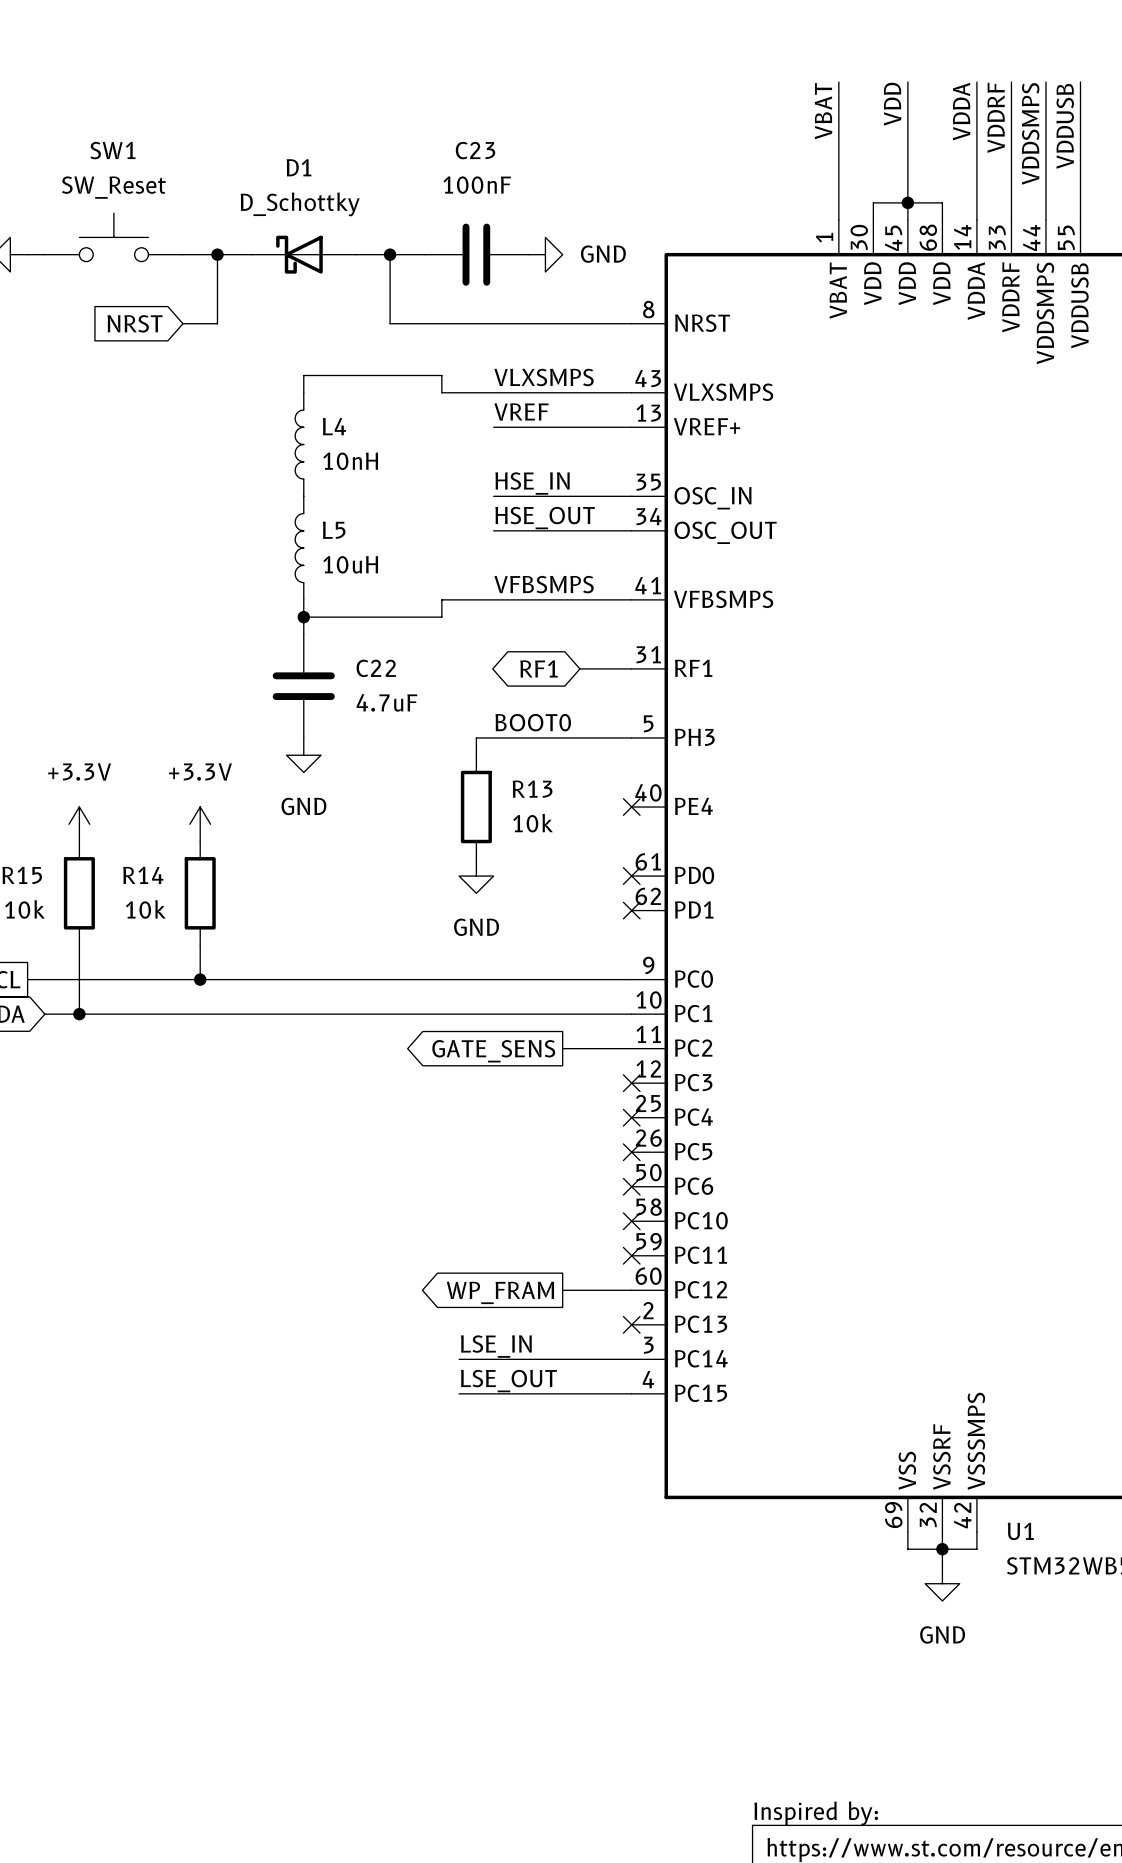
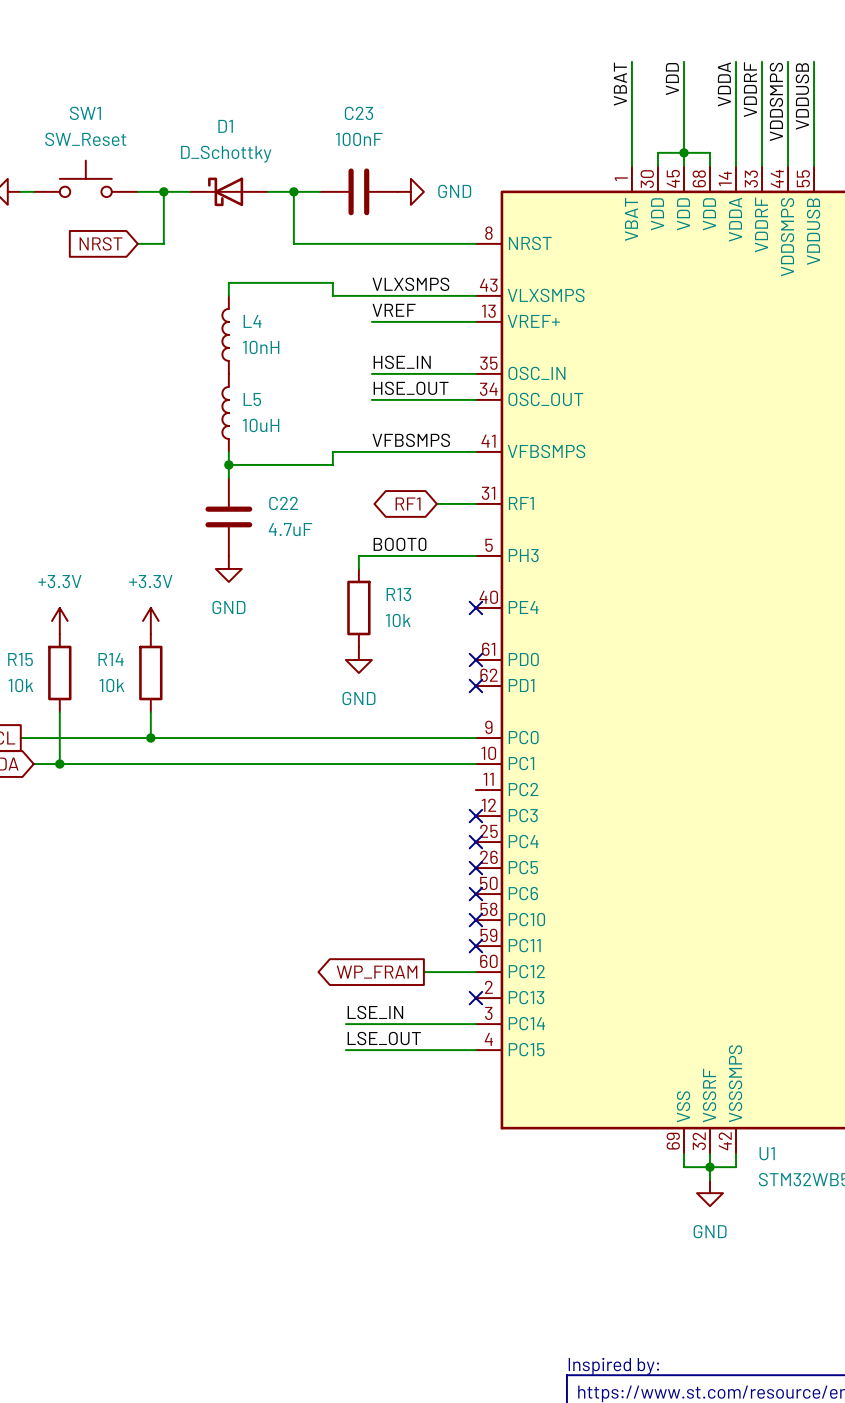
wire: (562, 1048) (631, 1048) -> none
global label: GATE_SENS (493, 1051) -> none

